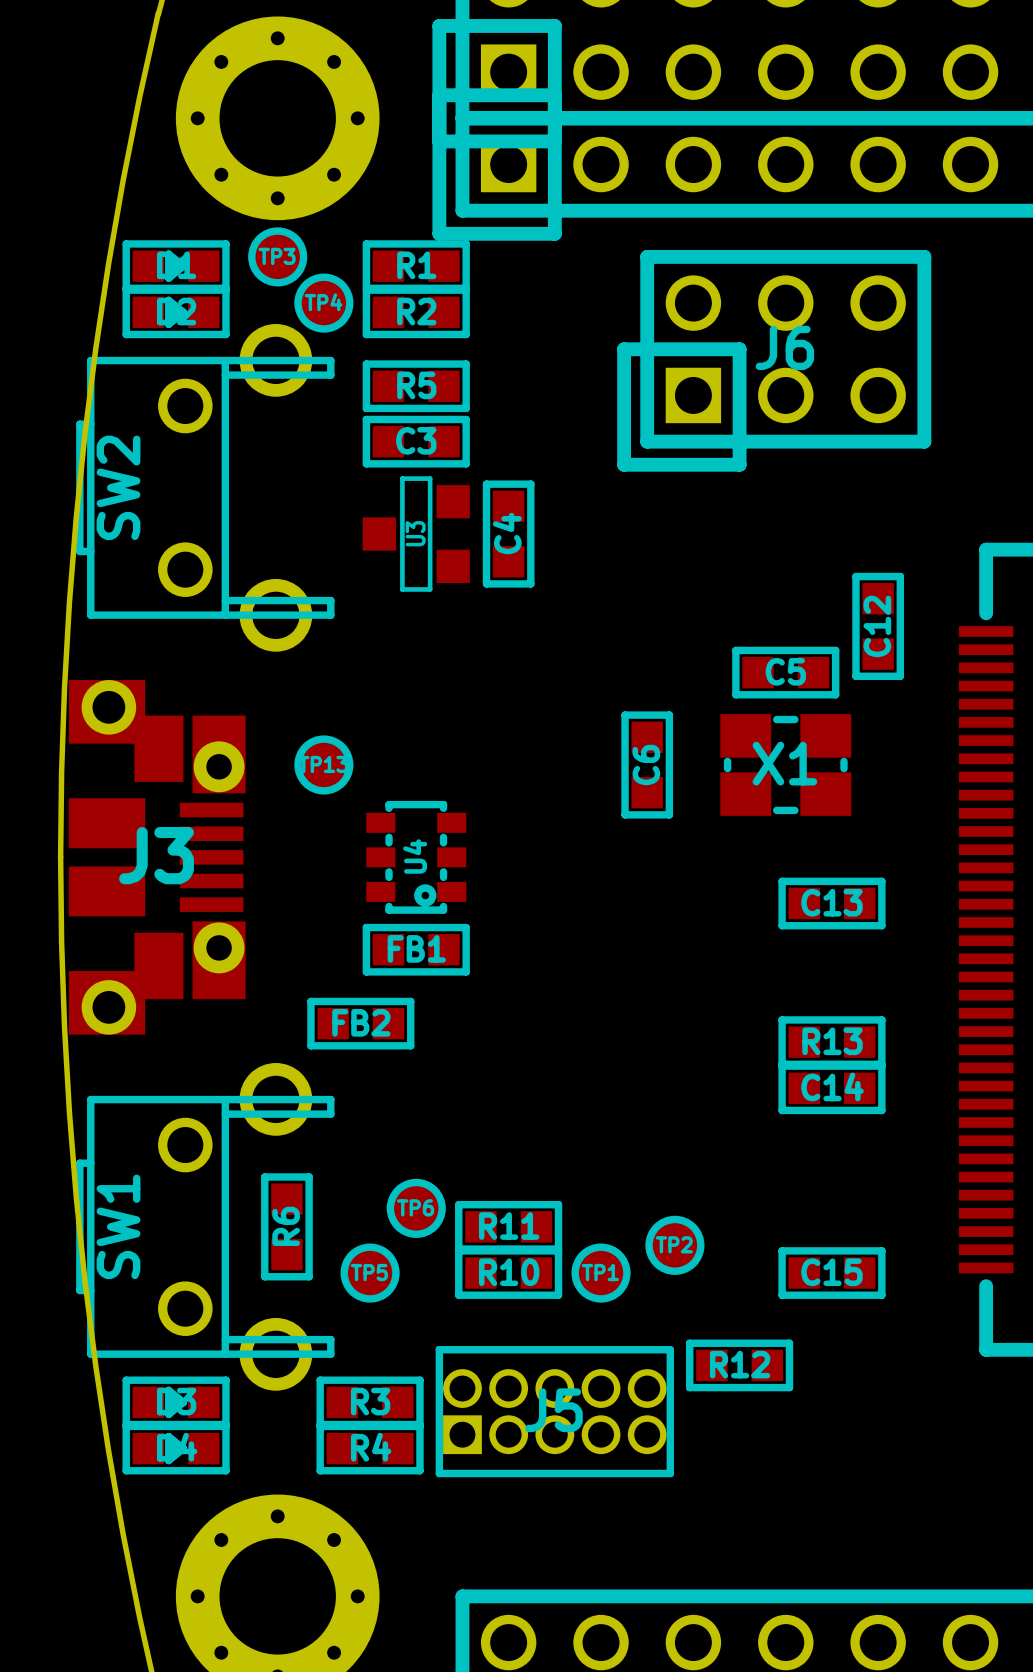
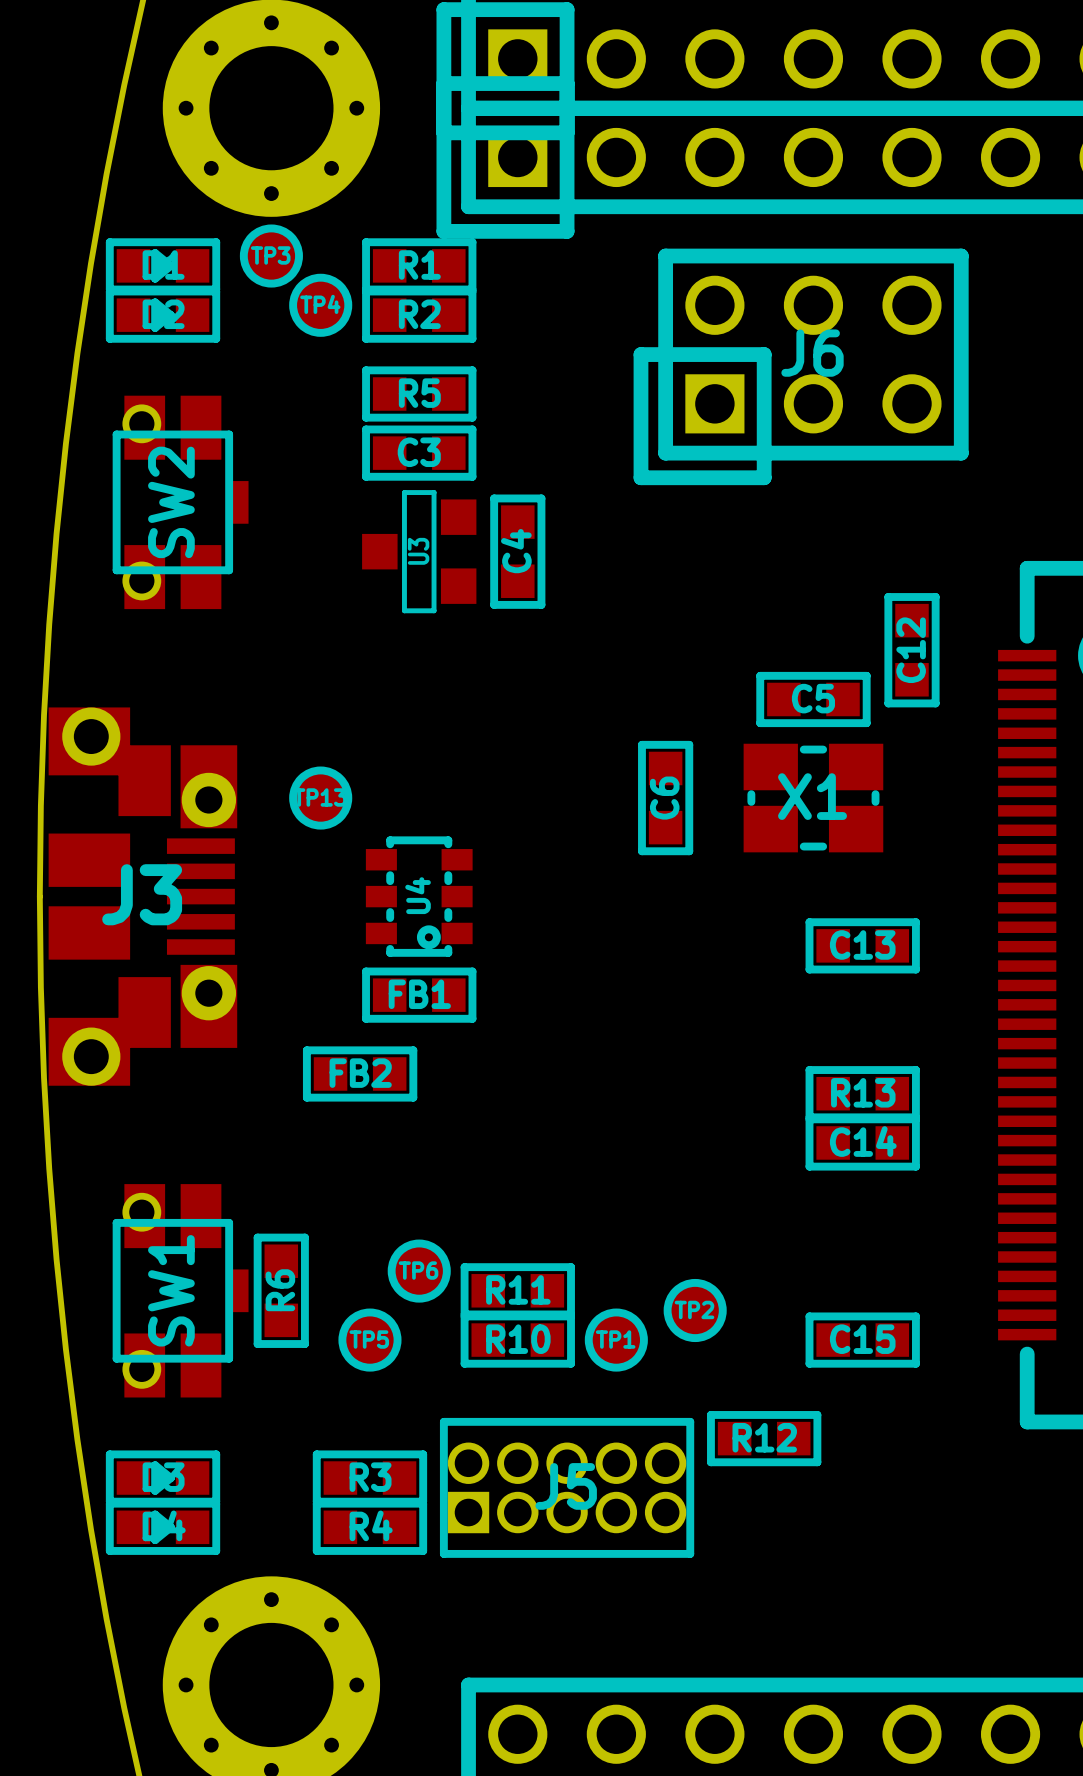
SW2 footprint: [76, 324, 335, 652] -> [112, 395, 249, 610]
SW2 name position: SW2 (118, 487) -> SW2 (171, 502)
SW1 footprint: [76, 1063, 335, 1391] -> [112, 1184, 249, 1398]
SW1 name position: SW1 (118, 1226) -> SW1 (171, 1290)

